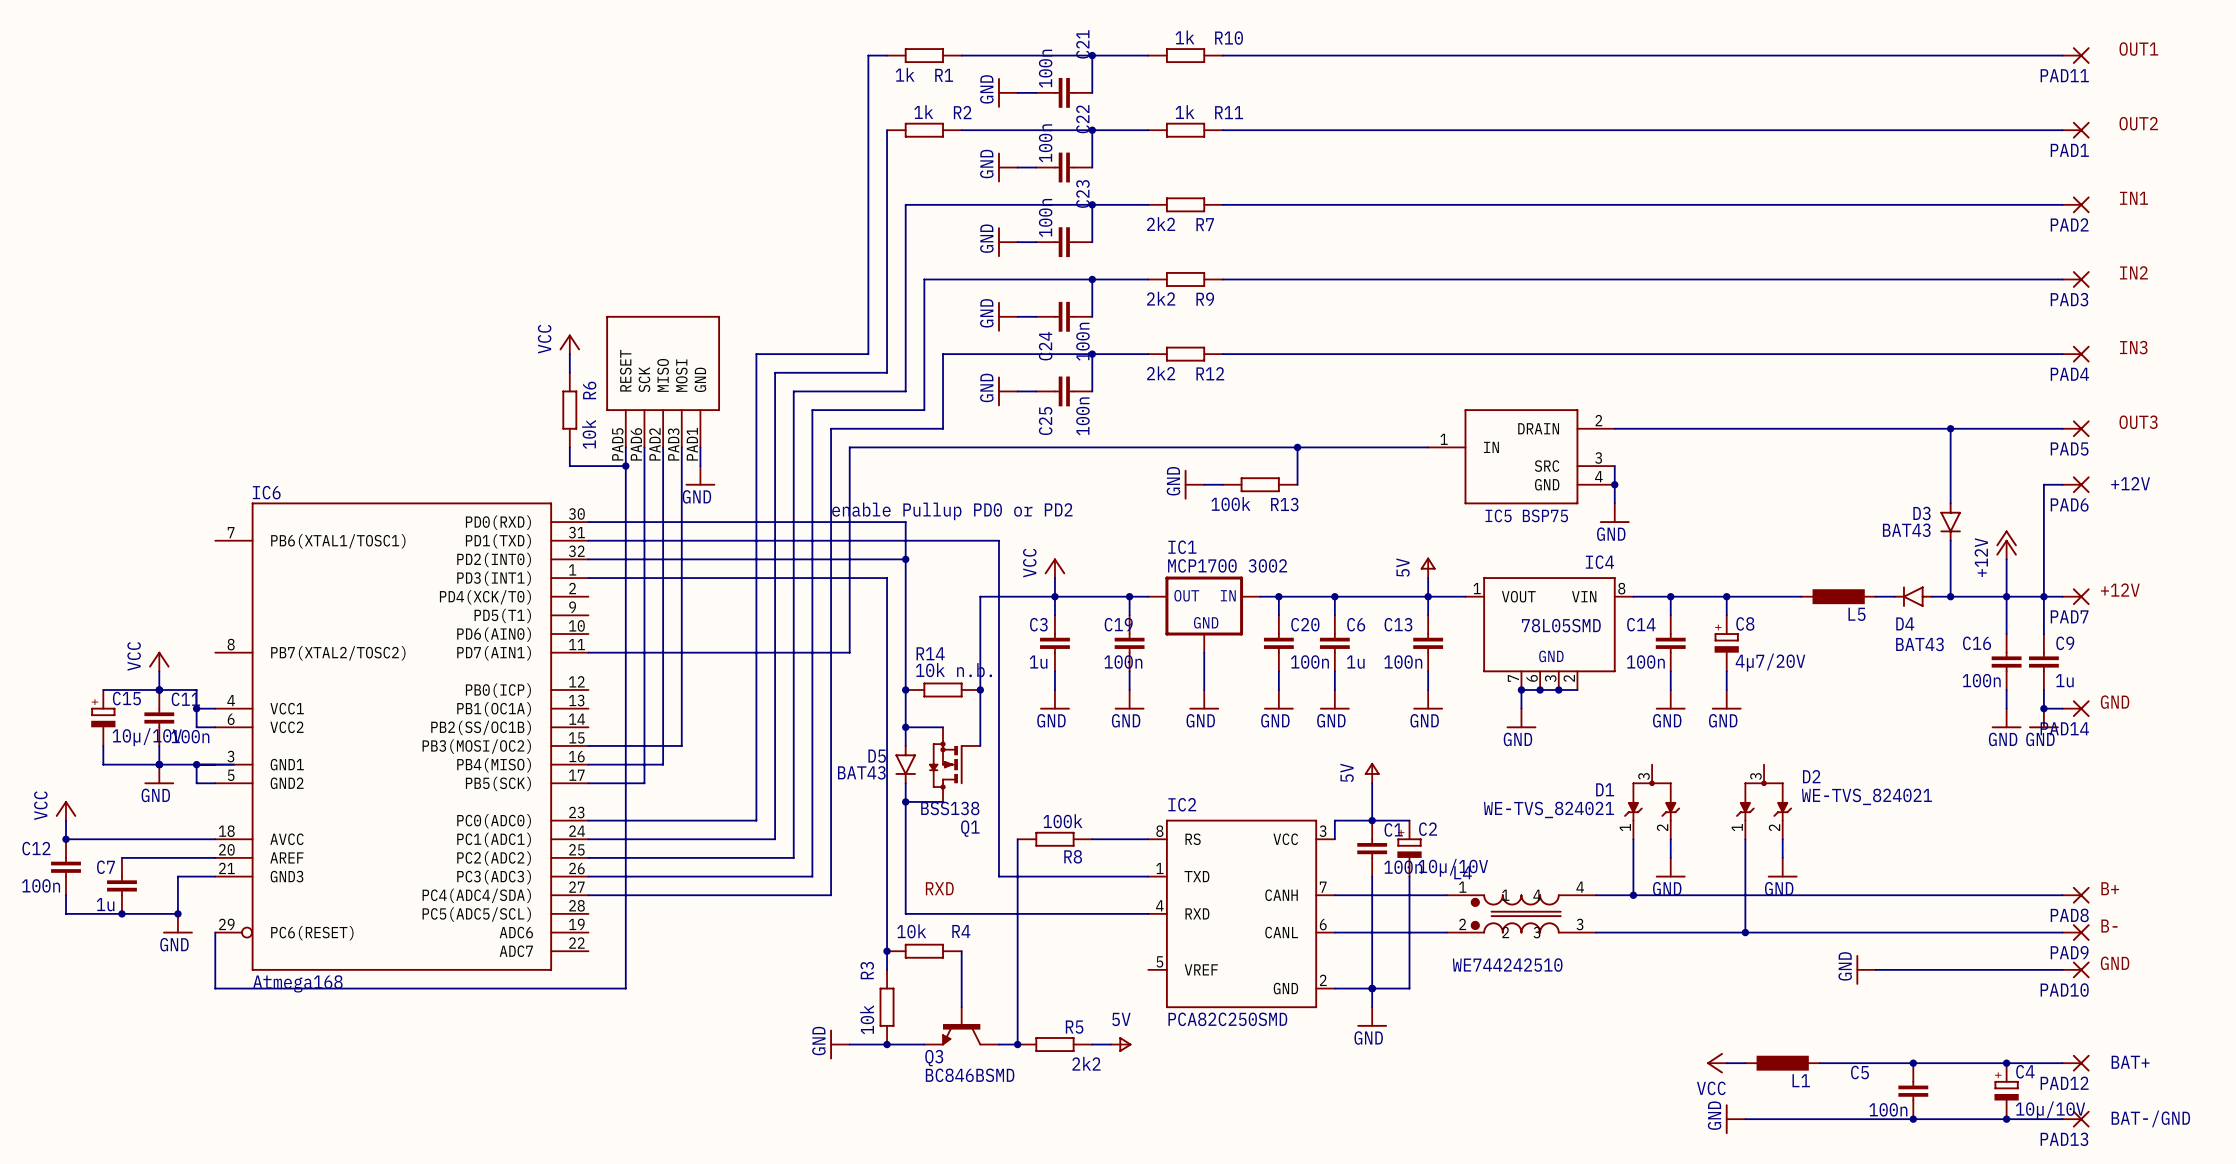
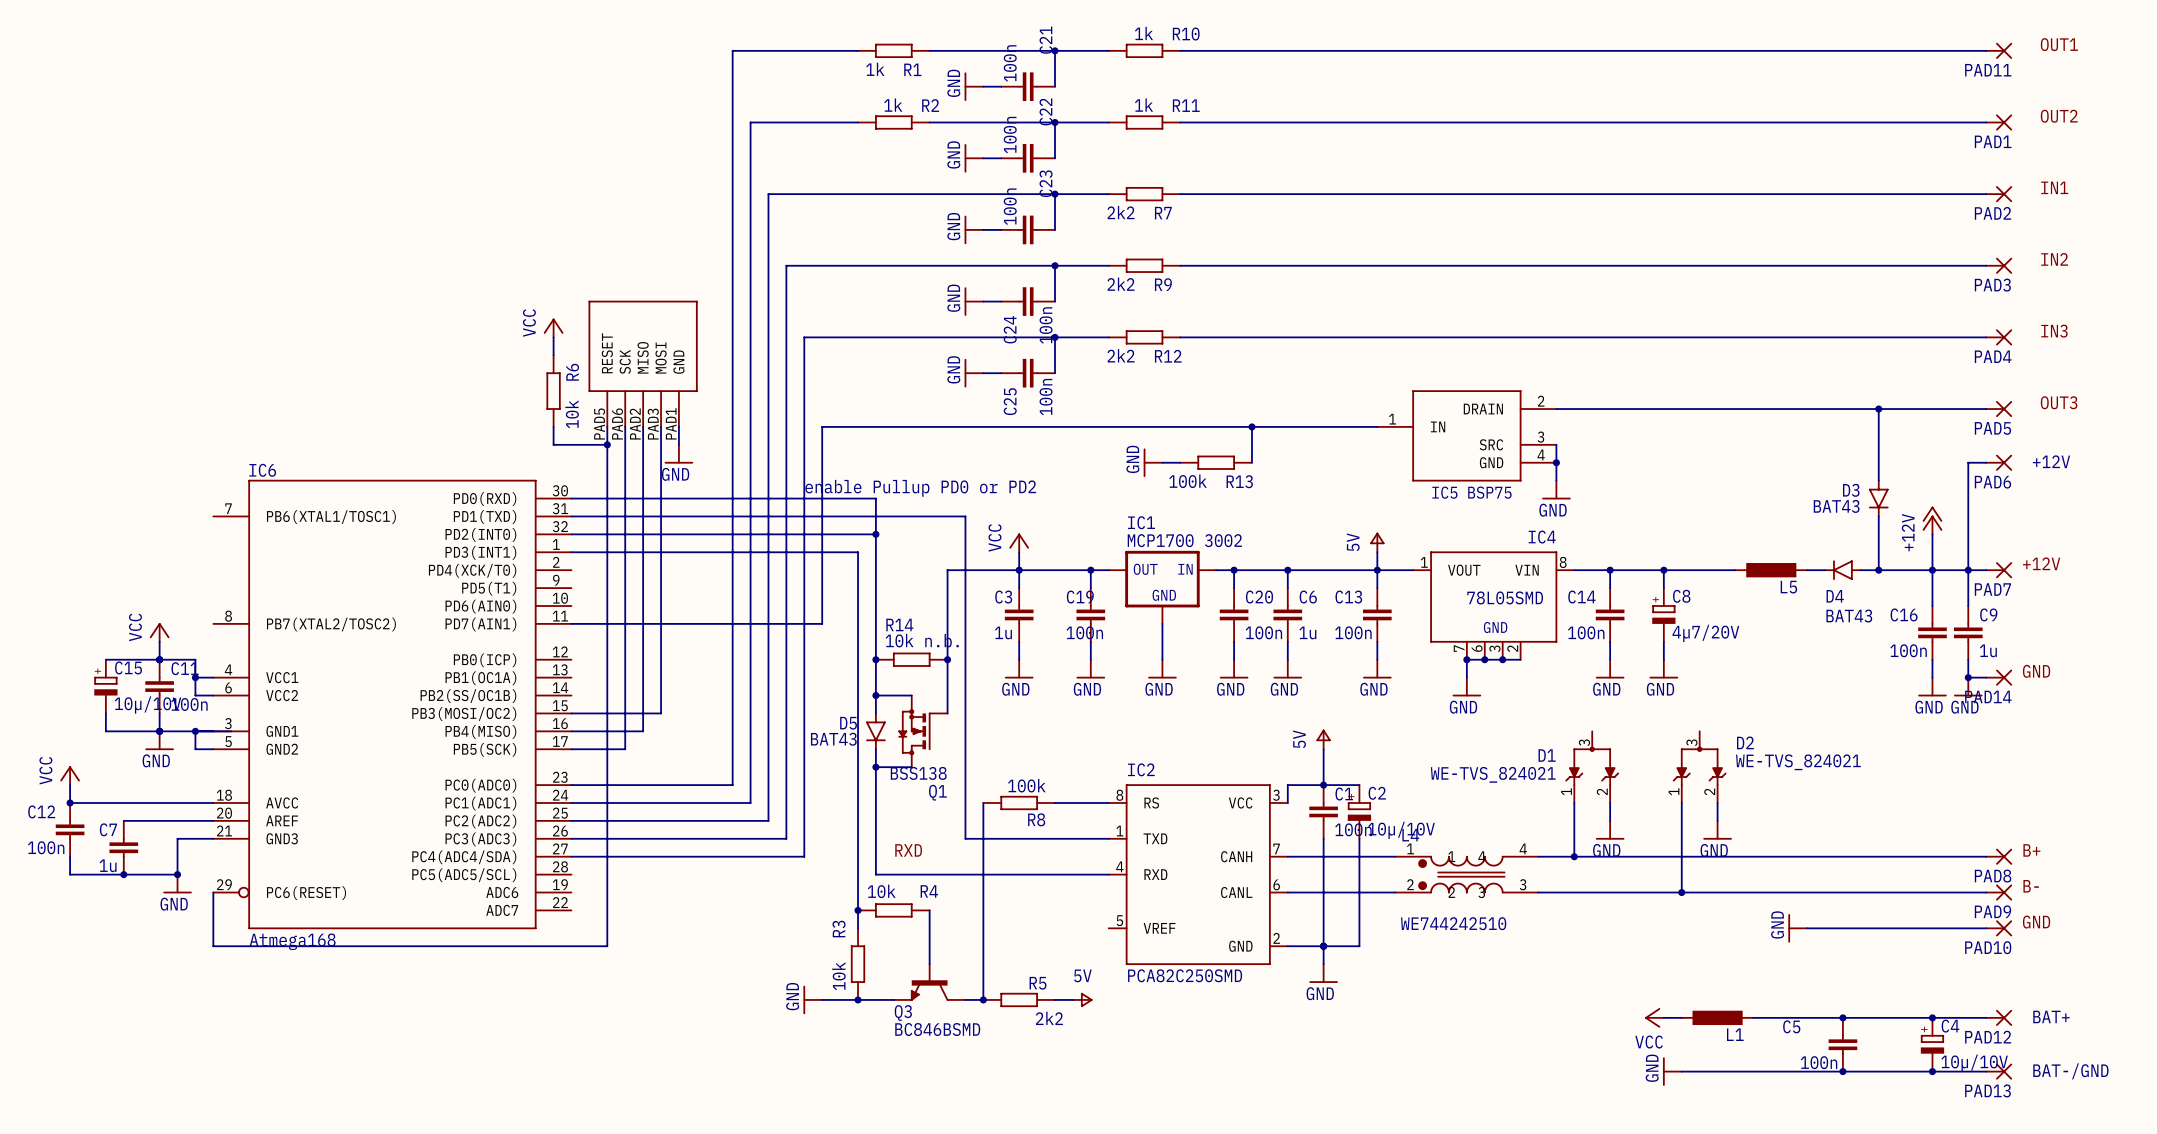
wire: (868, 55) (868, 354) -> (840, 50) (732, 50) (732, 337)
wire: (887, 130) (887, 372) (775, 372) -> (858, 122) (750, 122) (750, 355)
wire: (905, 204) (905, 391) (793, 391) -> (875, 194) (768, 194) (768, 373)
wire: (924, 279) (924, 410) (812, 410) -> (893, 265) (786, 265) (786, 391)
wire: (756, 354) (831, 354) -> (804, 409) (804, 337)
wire: (943, 354) (943, 428) (831, 428) -> (911, 337) (840, 337)

